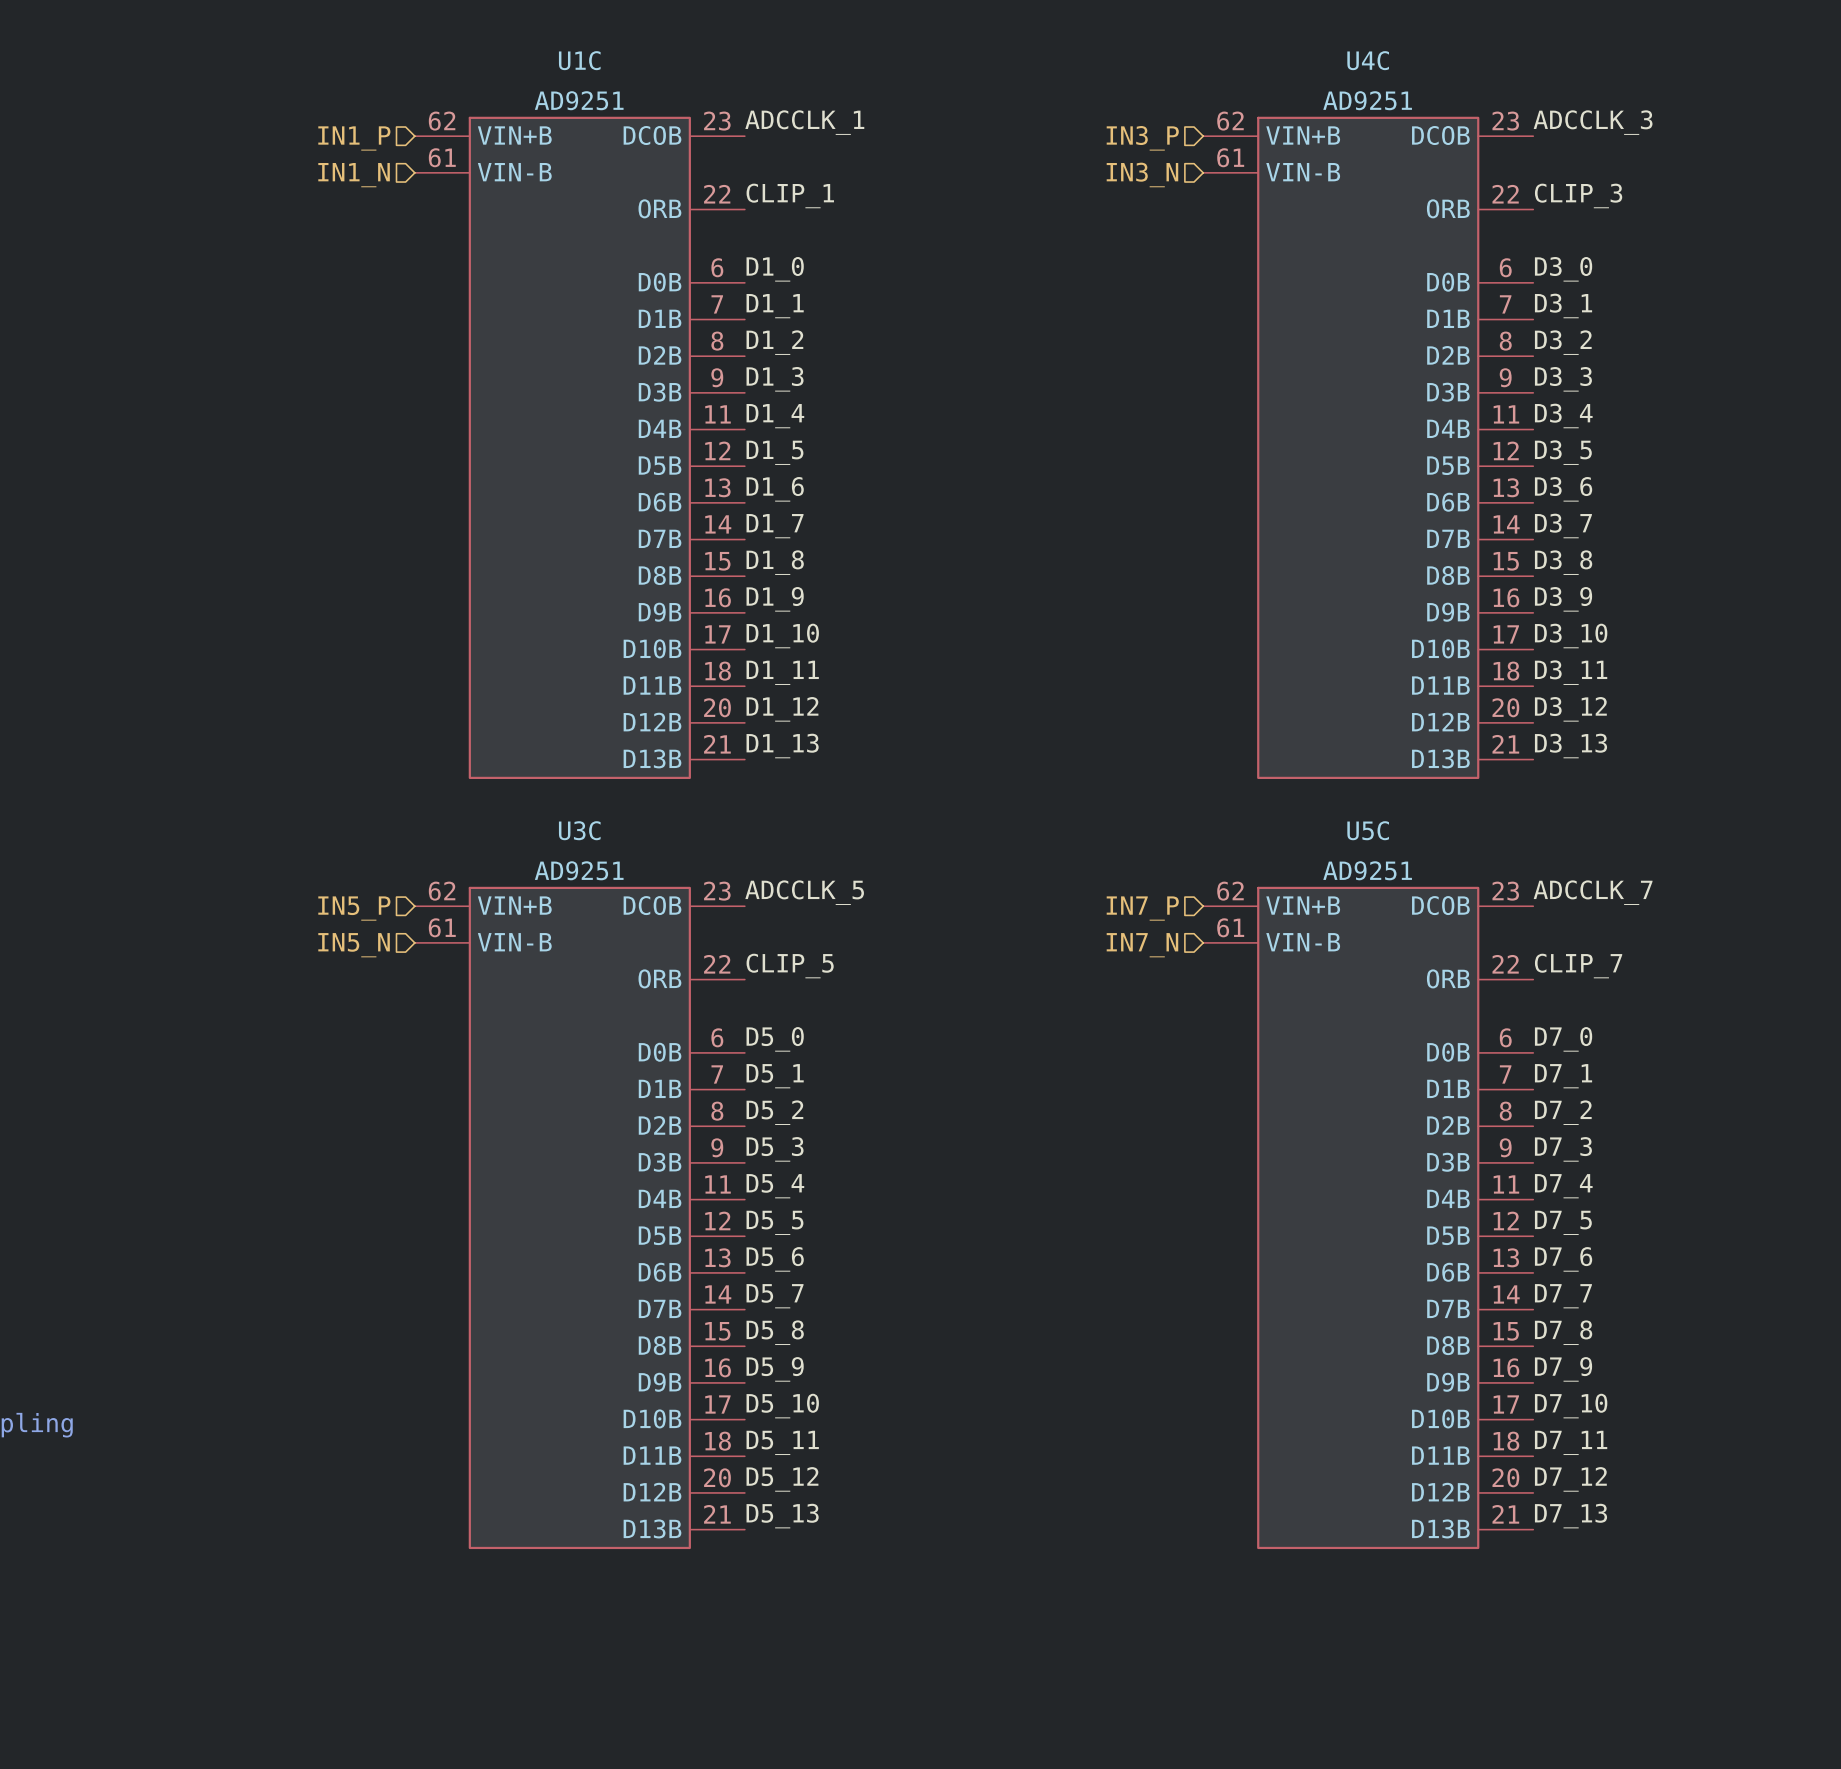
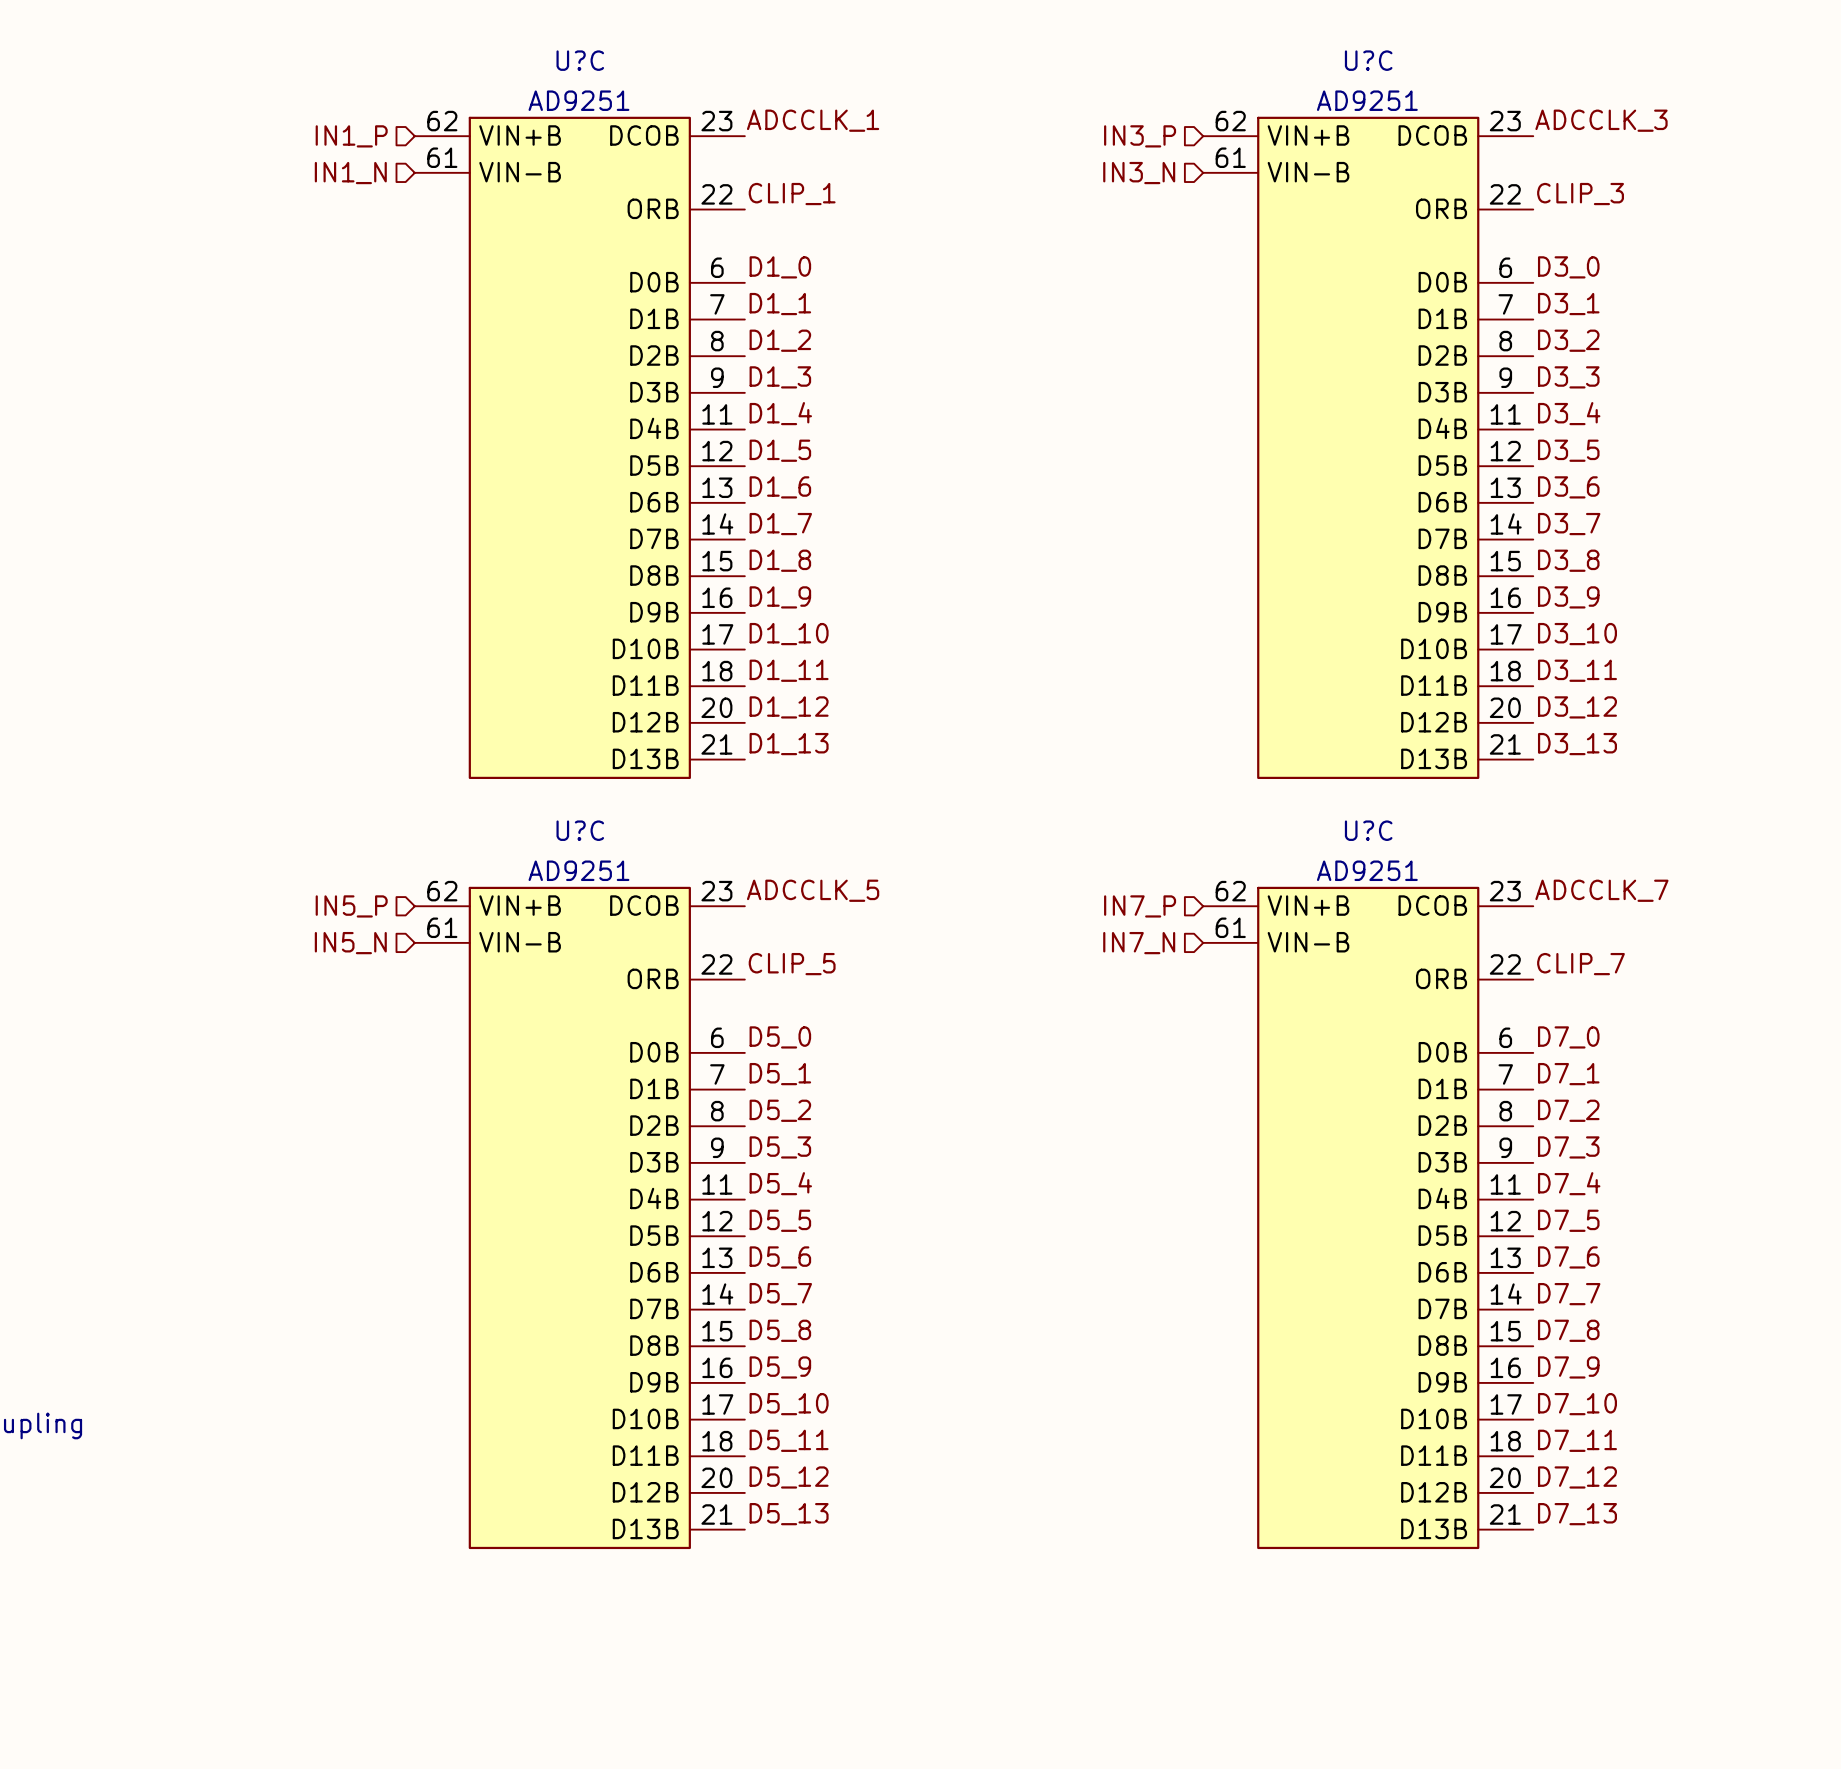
U1C name: U1C (579, 60) -> U?C (580, 60)
U4C name: U4C (1368, 60) -> U?C (1368, 60)
U3C name: U3C (579, 830) -> U?C (580, 830)
U5C name: U5C (1368, 830) -> U?C (1368, 830)

